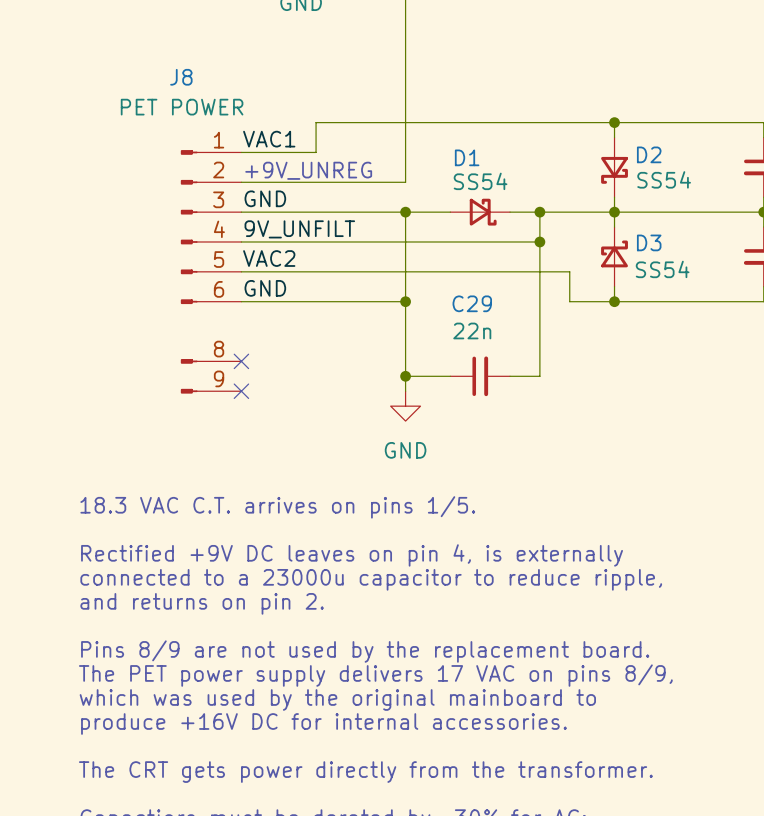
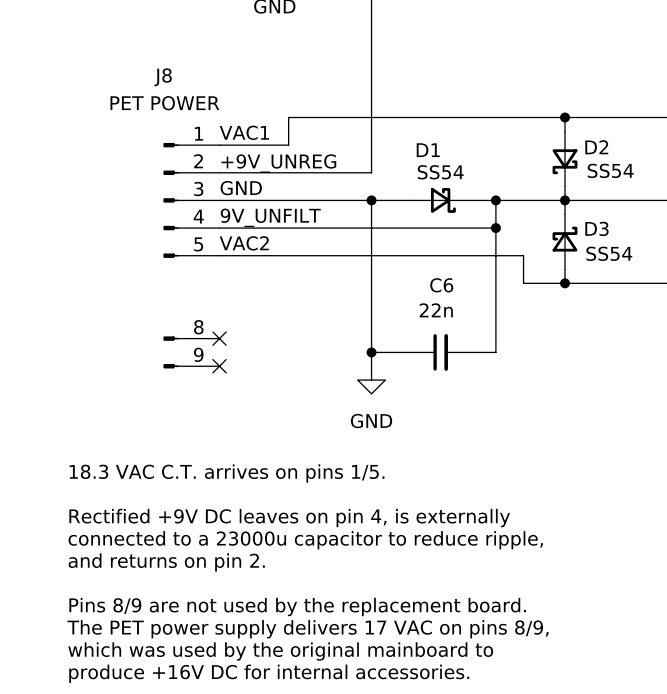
J8 symbol: [180, 150, 242, 394] -> [163, 142, 220, 369]
label: GND (265, 288) -> none
wire: (241, 301) (405, 301) -> none
junction: (405, 301) -> none
C29 name: C29 (472, 303) -> C6 (441, 285)

